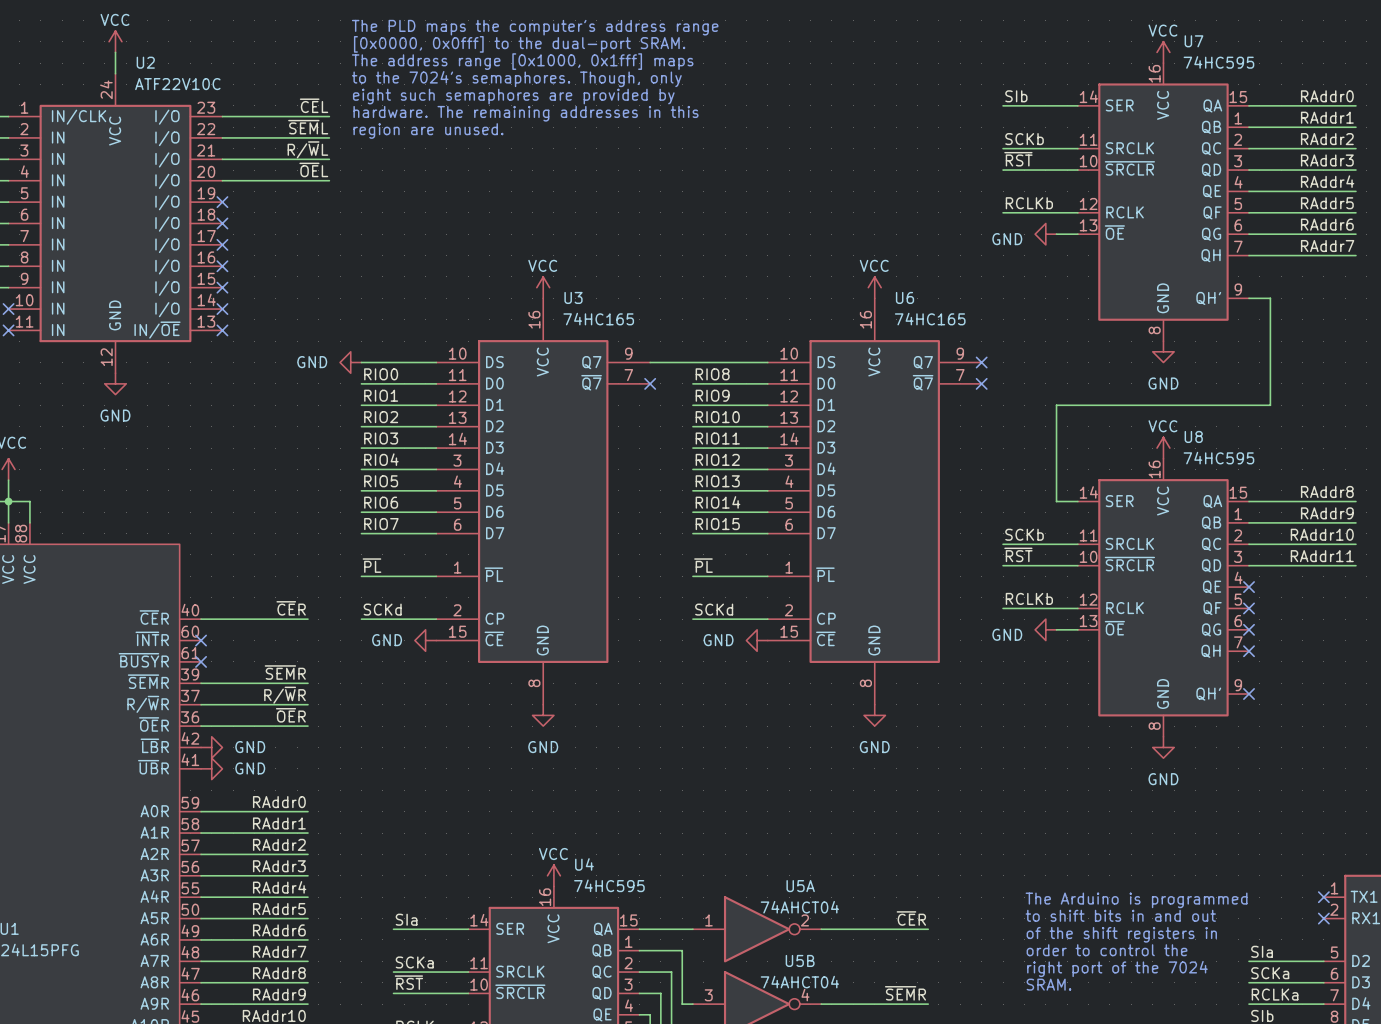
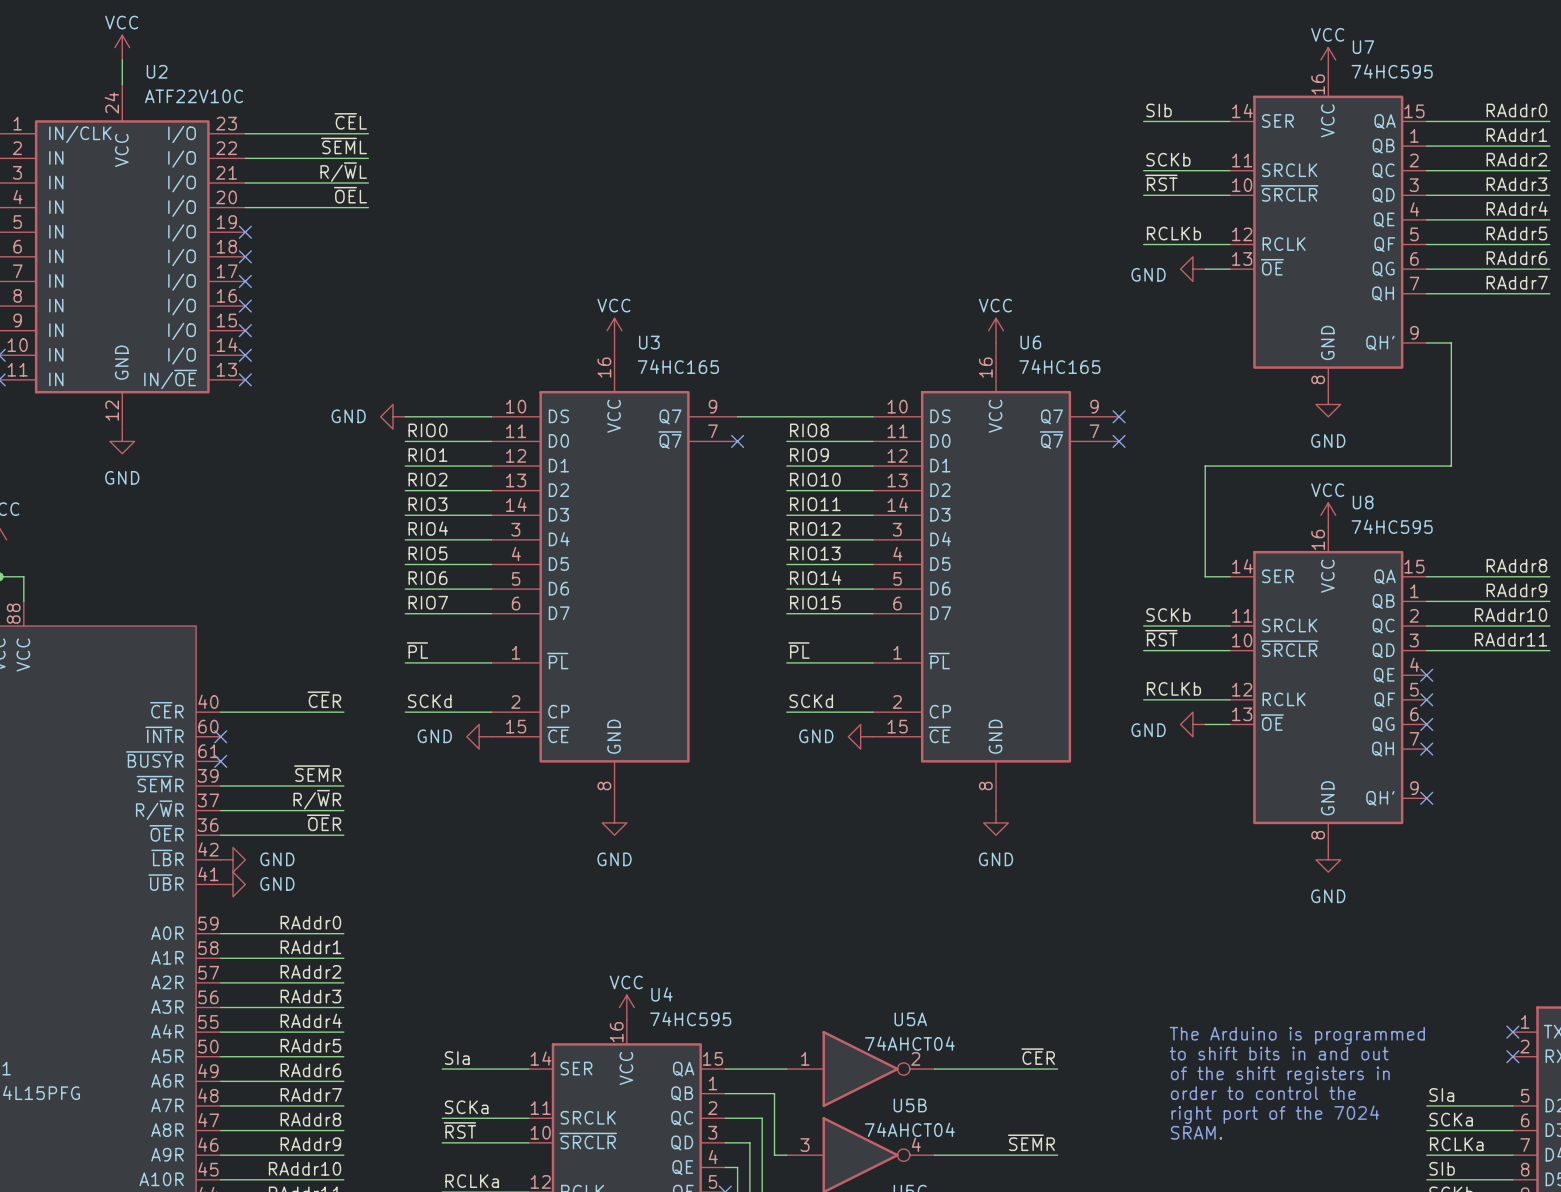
text: The PLD maps the computer's address range (535, 27) -> none
text: [0x0000, 0x0fff] to the dual-port SRAM. (519, 44) -> none
text: The address range [0x1000, 0x1fff] maps (522, 61) -> none
text: to the 7024's semaphores. Though, only (516, 79) -> none
text: eight such semaphores are provided by (513, 96) -> none
text: hardware. The remaining addresses in this (526, 113) -> none
text: region are unused. (428, 130) -> none

